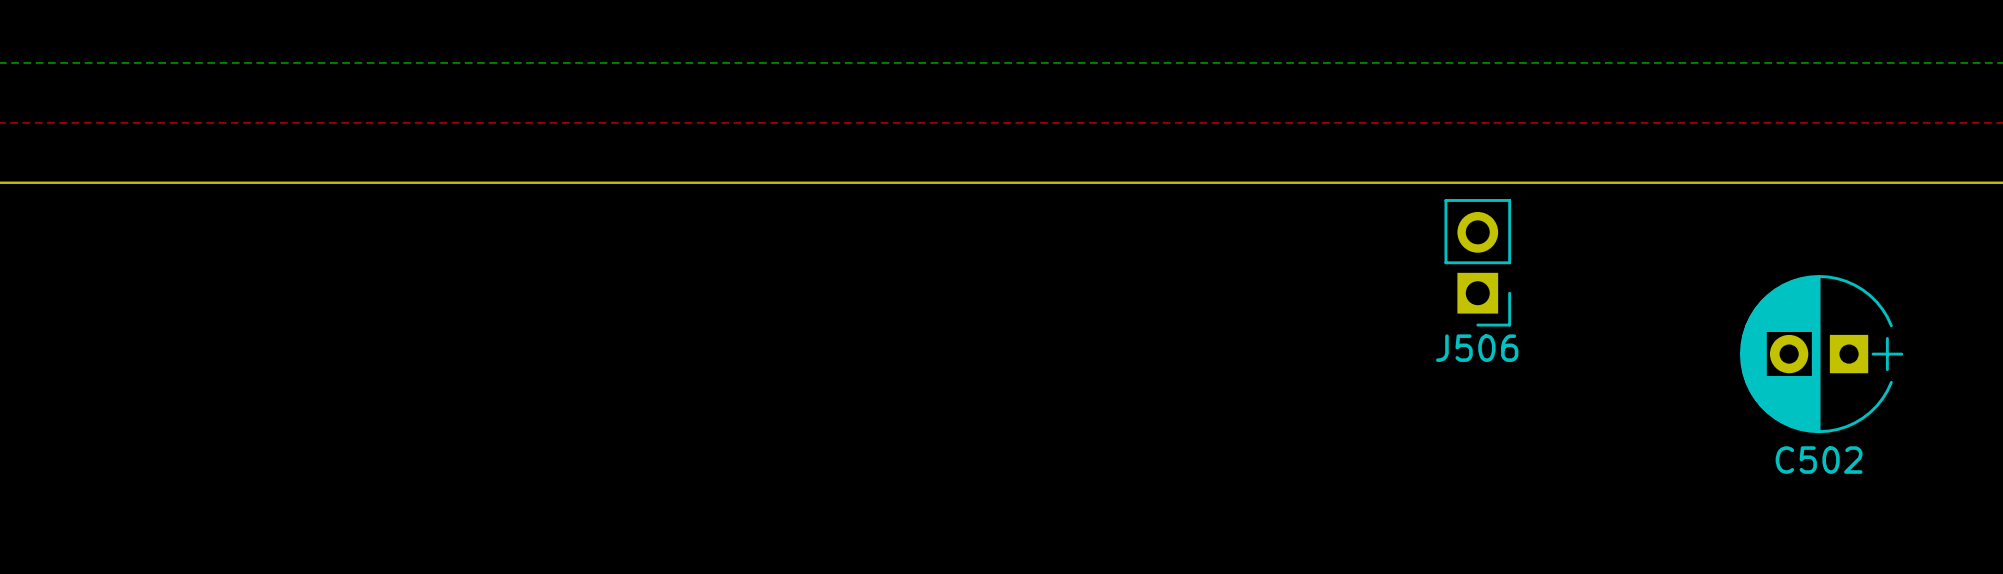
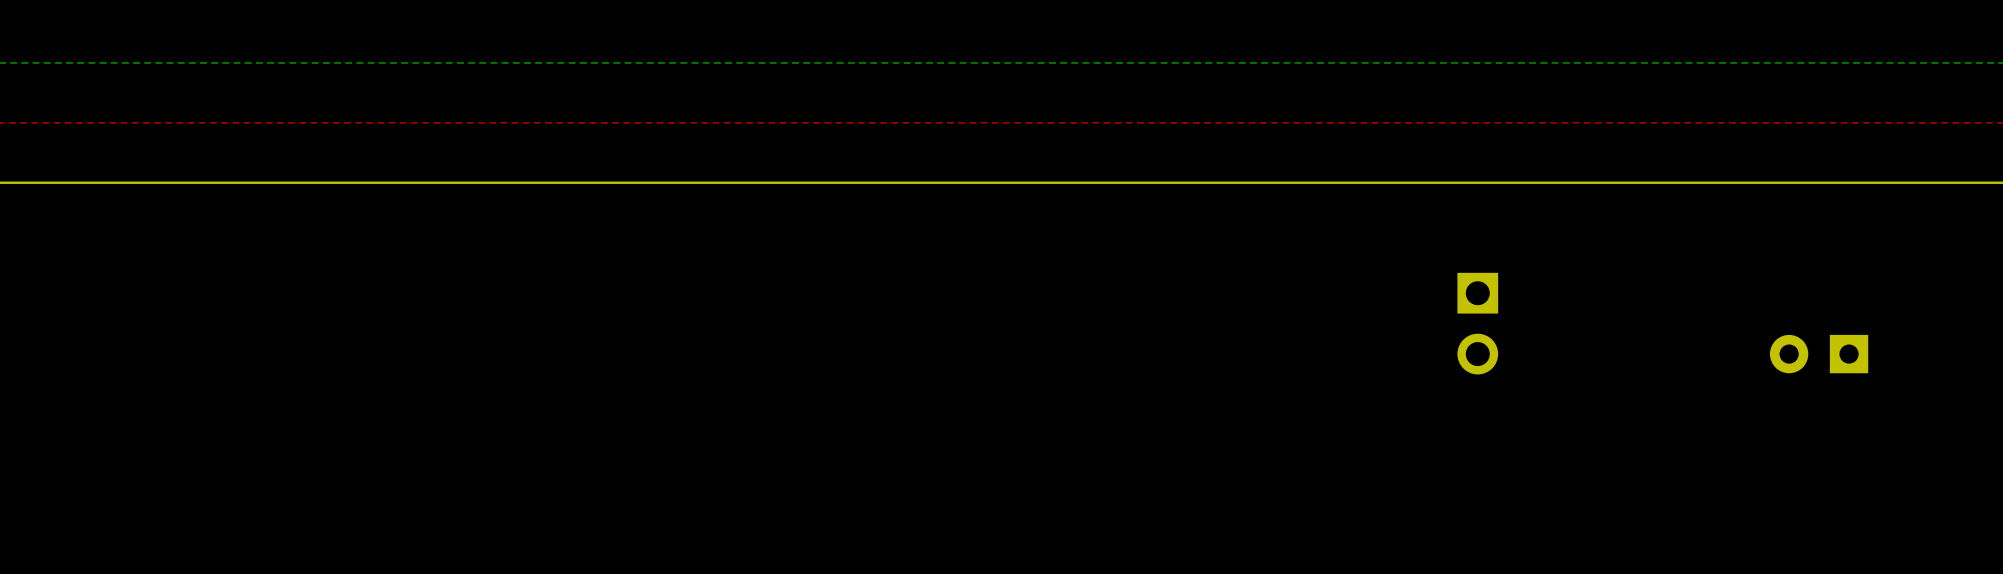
J506 side: bottom (1477, 262) -> top (1477, 323)
C502 side: bottom (1821, 354) -> top (1819, 354)

